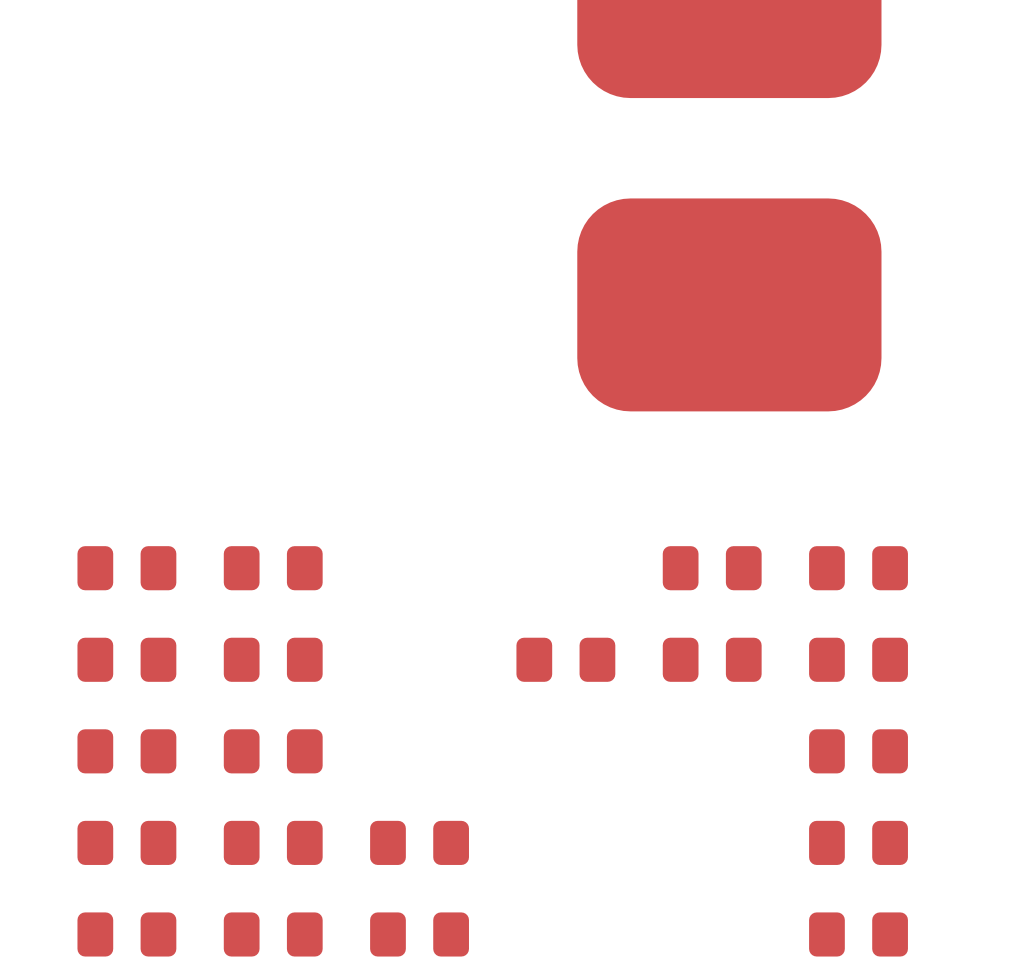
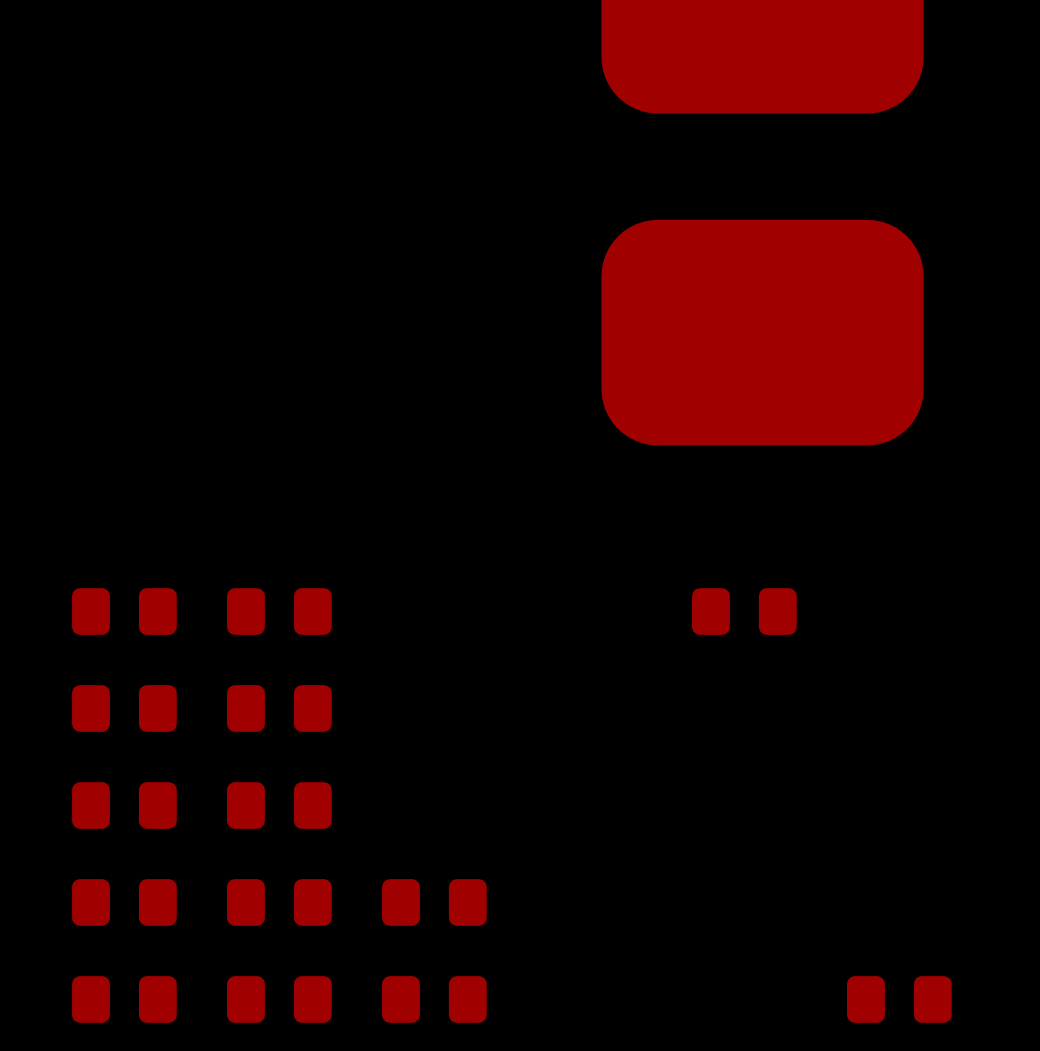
part: (858, 568) -> none
part: (565, 659) -> none
part: (712, 659) -> none
part: (858, 659) -> none
part: (858, 751) -> none
part: (858, 842) -> none

